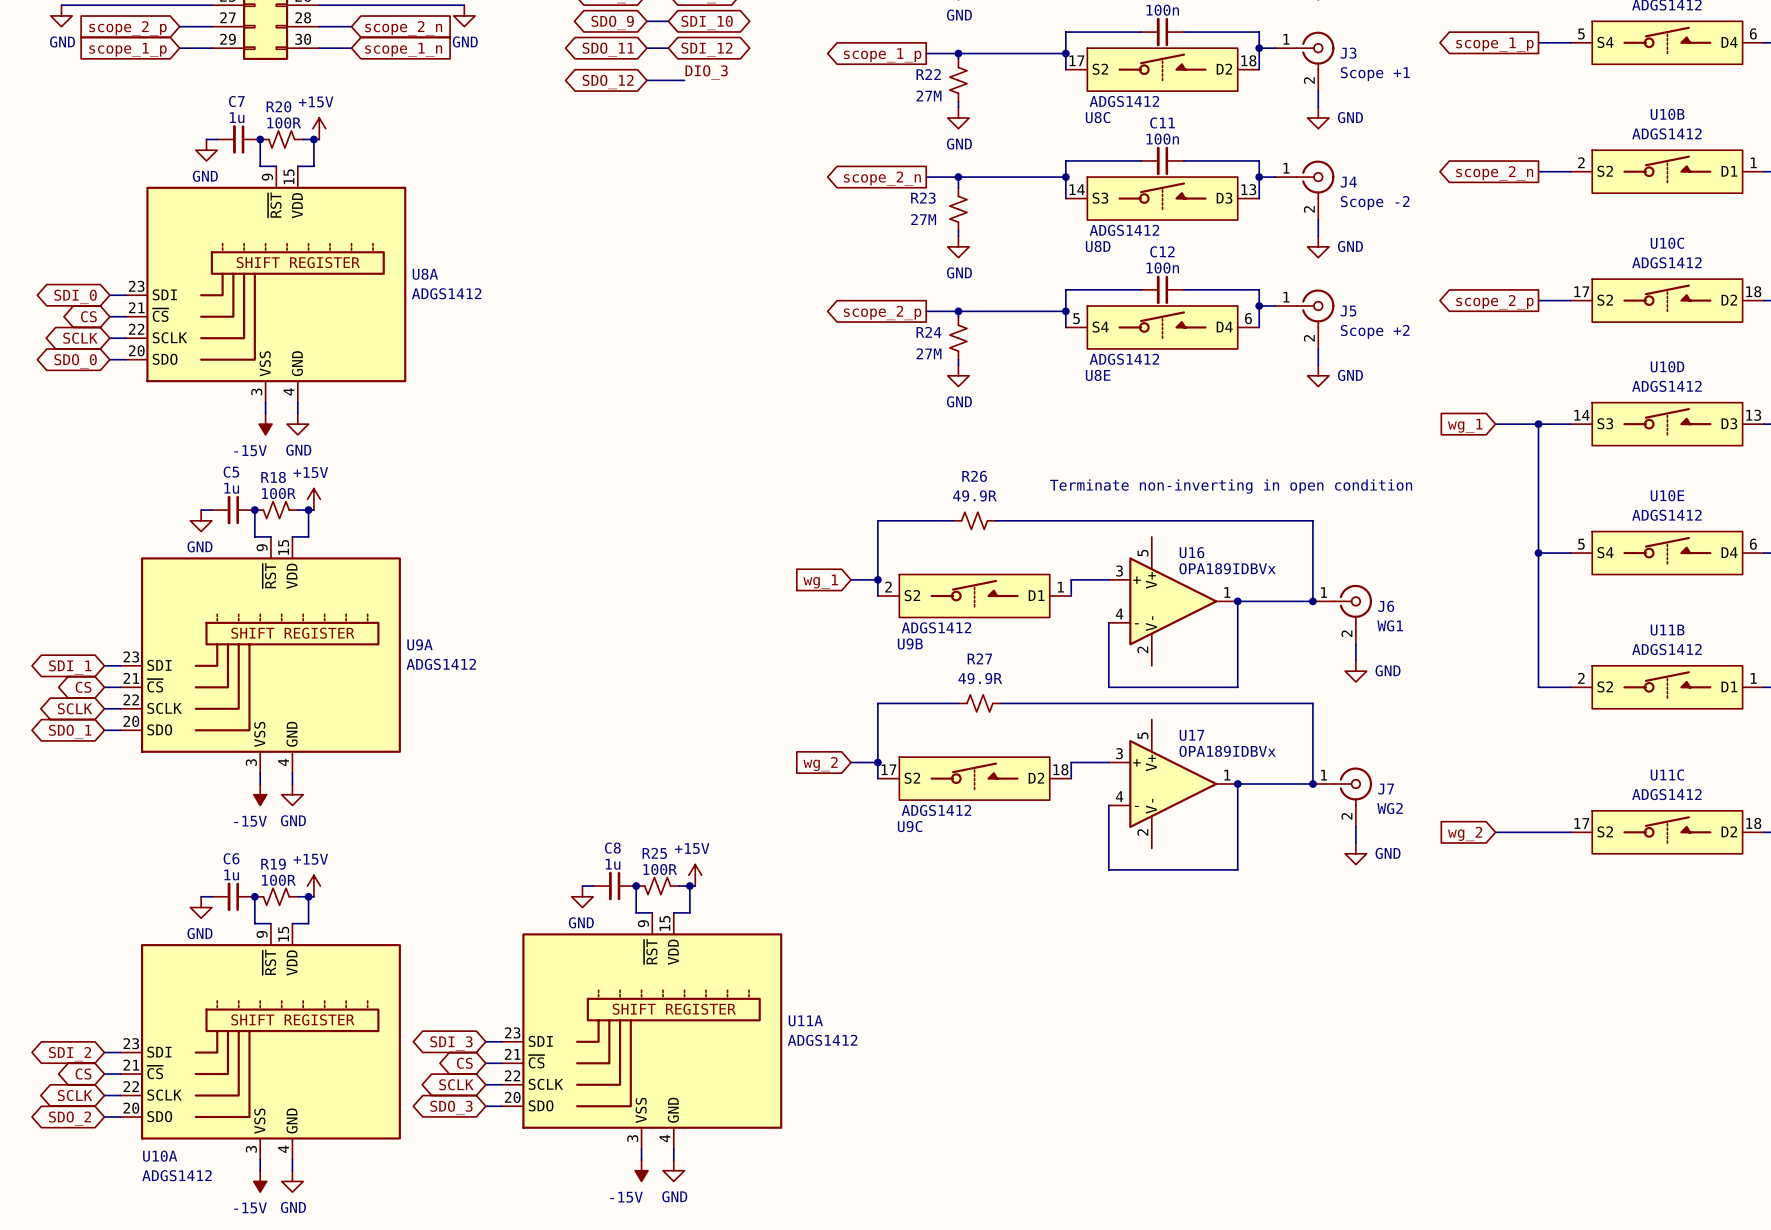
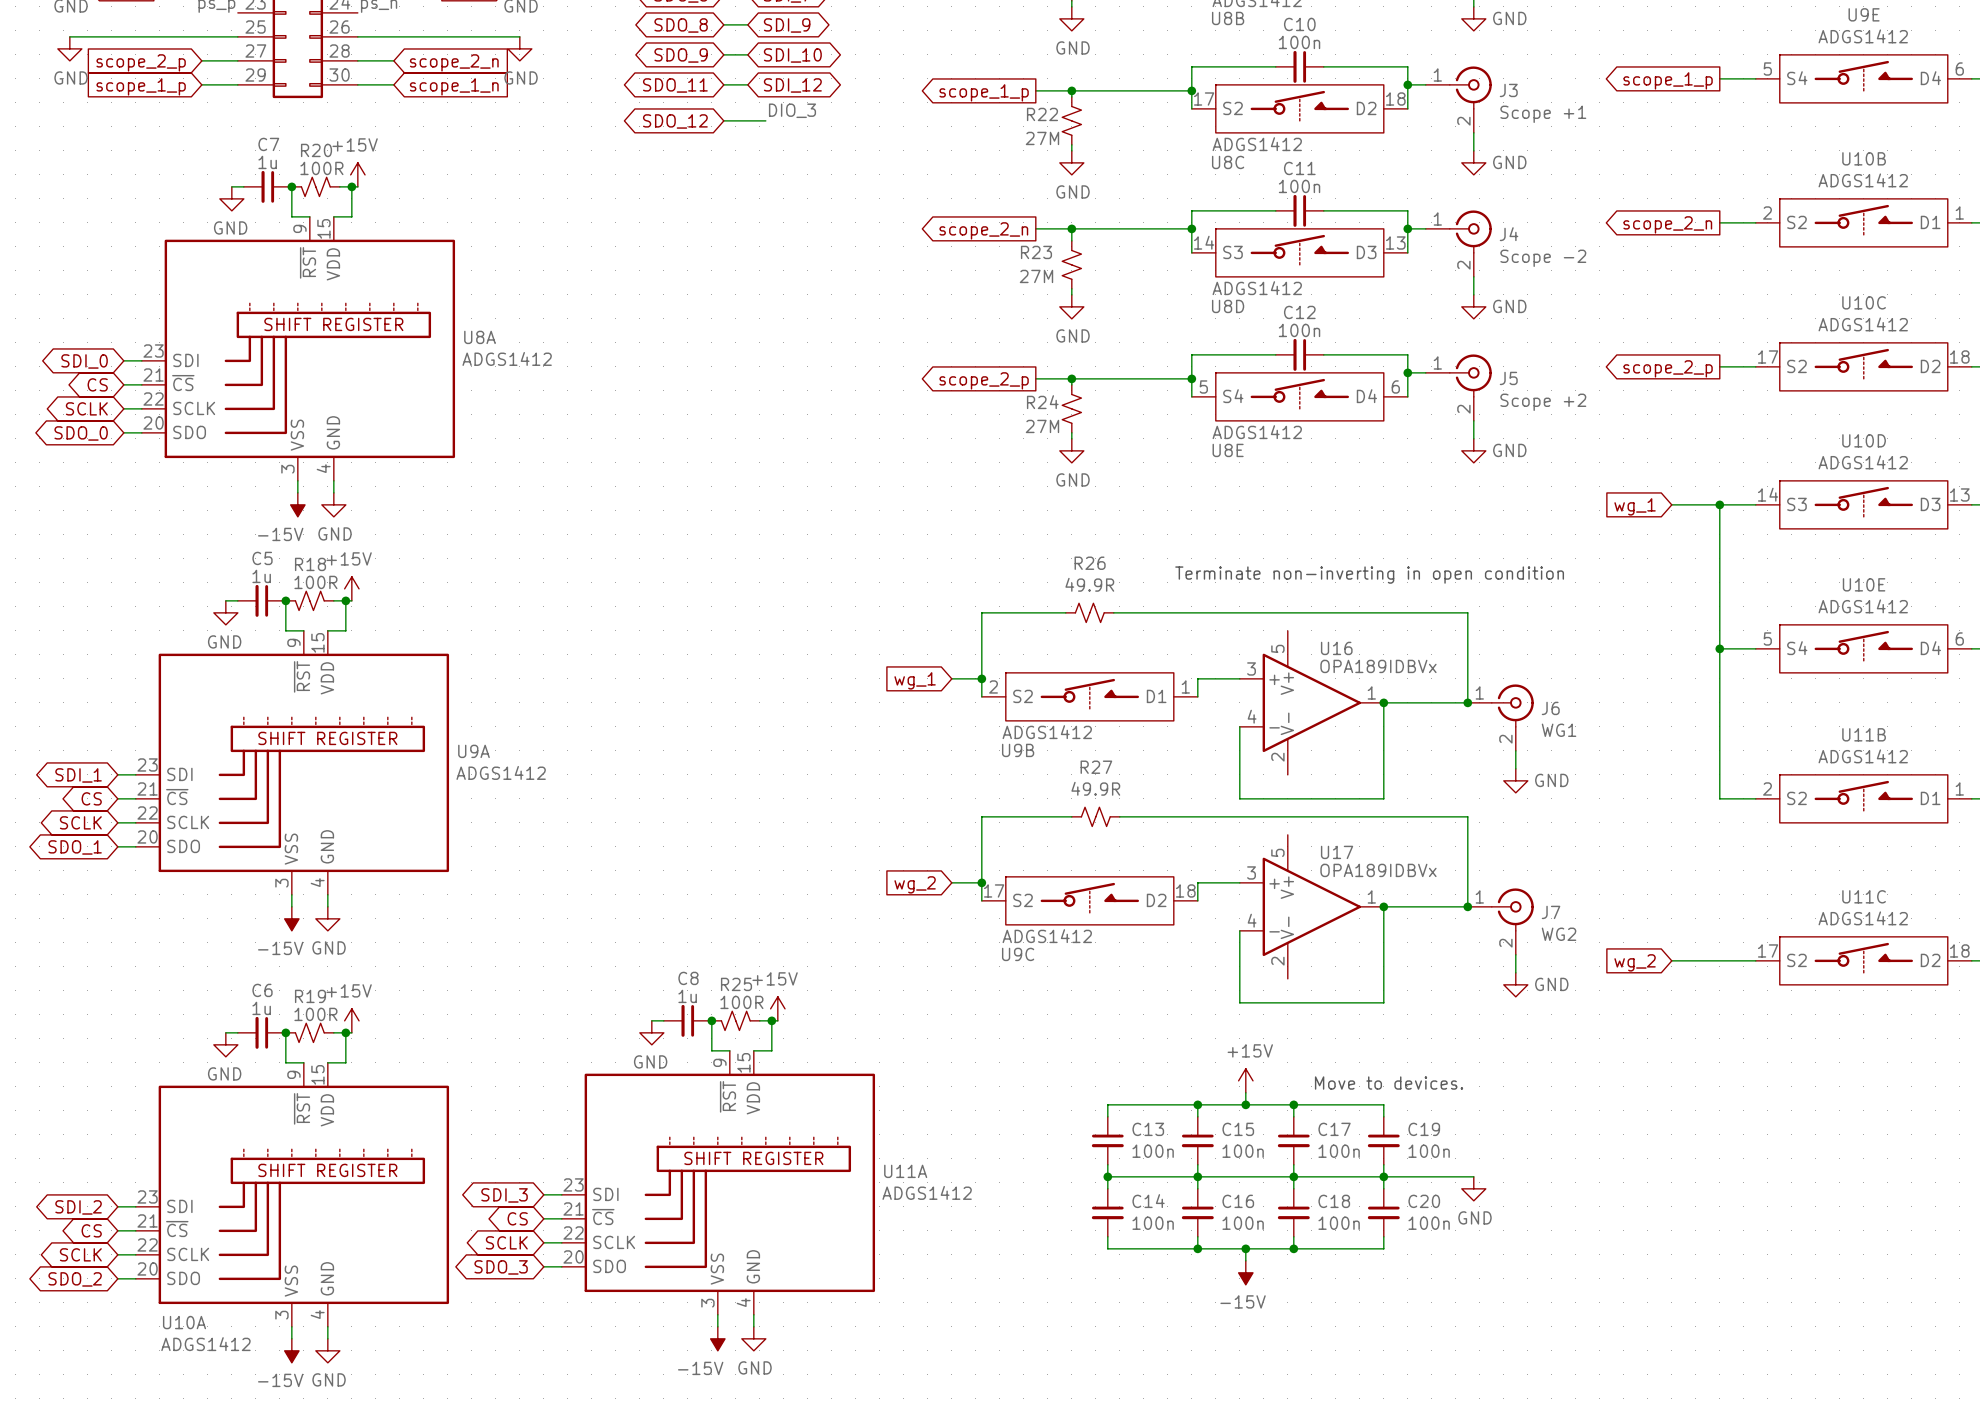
power symbol: none -> +15V (1245, 1080)
text: none -> Move to devices. (1389, 1083)
wire: none -> (1245, 1092) (1245, 1104)
wire: none -> (1197, 1104) (1197, 1116)
junction: none -> (1197, 1104)
junction: none -> (1245, 1104)
wire: none -> (1293, 1104) (1293, 1116)
junction: none -> (1293, 1104)
wire: none -> (1107, 1116) (1107, 1104) (1383, 1104) (1383, 1116)
C13: none -> 100n (1107, 1140)
C15: none -> 100n (1197, 1140)
C17: none -> 100n (1293, 1140)
C19: none -> 100n (1383, 1140)
wire: none -> (1107, 1164) (1107, 1188)
wire: none -> (1197, 1164) (1197, 1188)
wire: none -> (1293, 1164) (1293, 1188)
wire: none -> (1383, 1164) (1383, 1188)
wire: none -> (1107, 1176) (1473, 1176)
junction: none -> (1107, 1176)
junction: none -> (1197, 1176)
junction: none -> (1293, 1176)
junction: none -> (1383, 1176)
power symbol: none -> GND (1473, 1188)
C14: none -> 100n (1107, 1212)
C16: none -> 100n (1197, 1212)
C18: none -> 100n (1293, 1212)
C20: none -> 100n (1383, 1212)
wire: none -> (1107, 1236) (1107, 1248) (1383, 1248) (1383, 1236)
wire: none -> (1197, 1236) (1197, 1248)
wire: none -> (1293, 1236) (1293, 1248)
junction: none -> (1197, 1248)
wire: none -> (1245, 1248) (1245, 1260)
junction: none -> (1245, 1248)
junction: none -> (1293, 1248)
power symbol: none -> -15V (1245, 1272)

